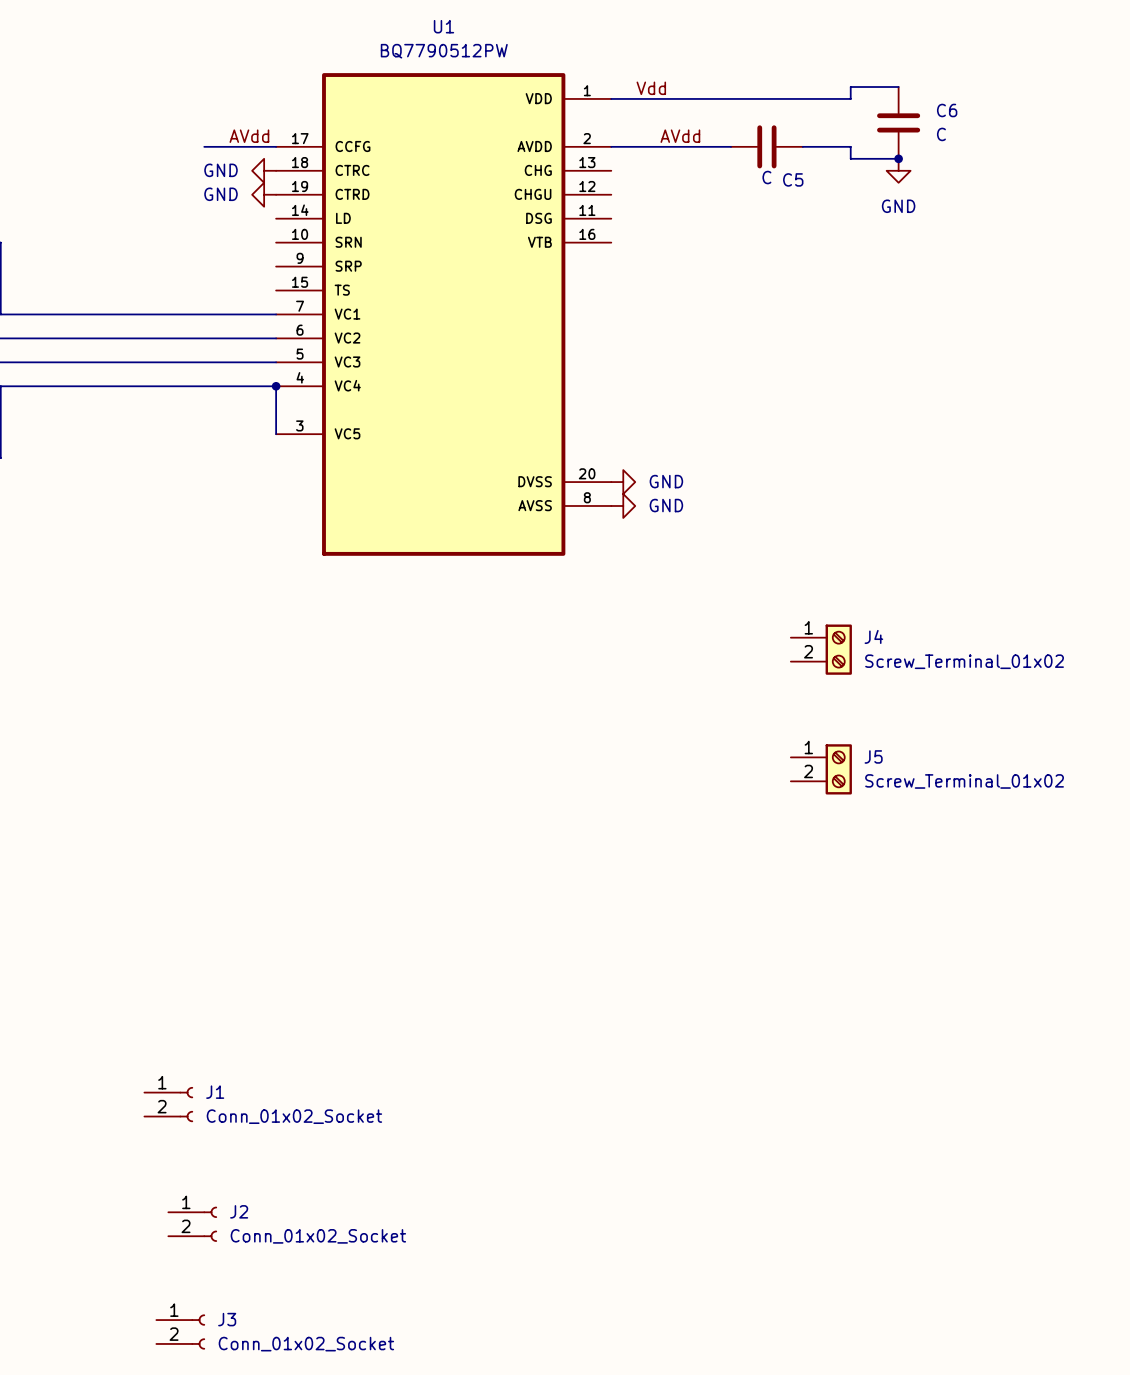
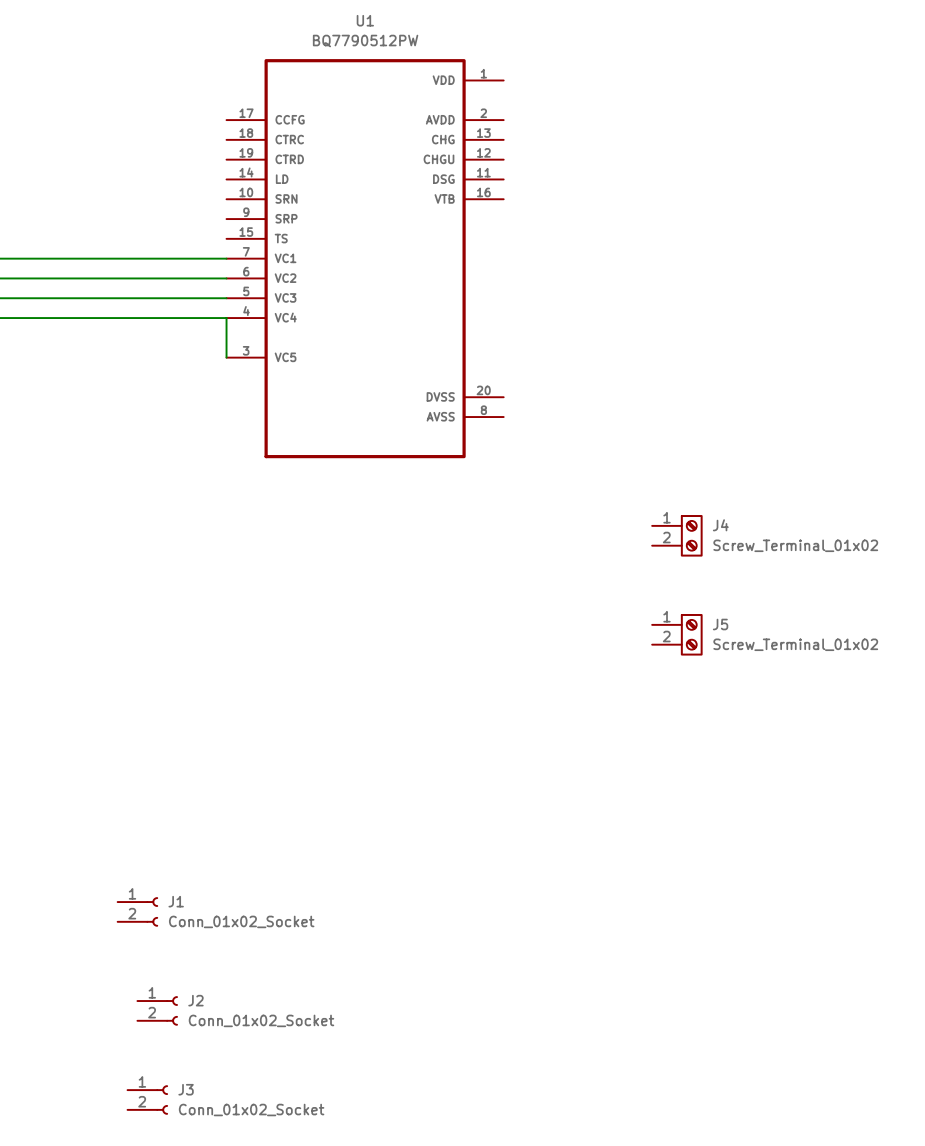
wire: (898, 87) (850, 87) (850, 98) (611, 98) -> none
label: Vdd (651, 88) -> none
C6: C (898, 122) -> none
label: AVdd (249, 136) -> none
label: AVdd (680, 136) -> none
wire: (204, 146) (276, 146) -> none
wire: (611, 146) (731, 146) -> none
C5: C (766, 146) -> none
wire: (802, 146) (850, 146) (850, 158) (898, 158) -> none
junction: (898, 158) -> none
power symbol: GND (264, 170) -> none
power symbol: GND (898, 170) -> none
power symbol: GND (264, 194) -> none
junction: (276, 386) -> none
power symbol: GND (623, 482) -> none
power symbol: GND (623, 505) -> none

